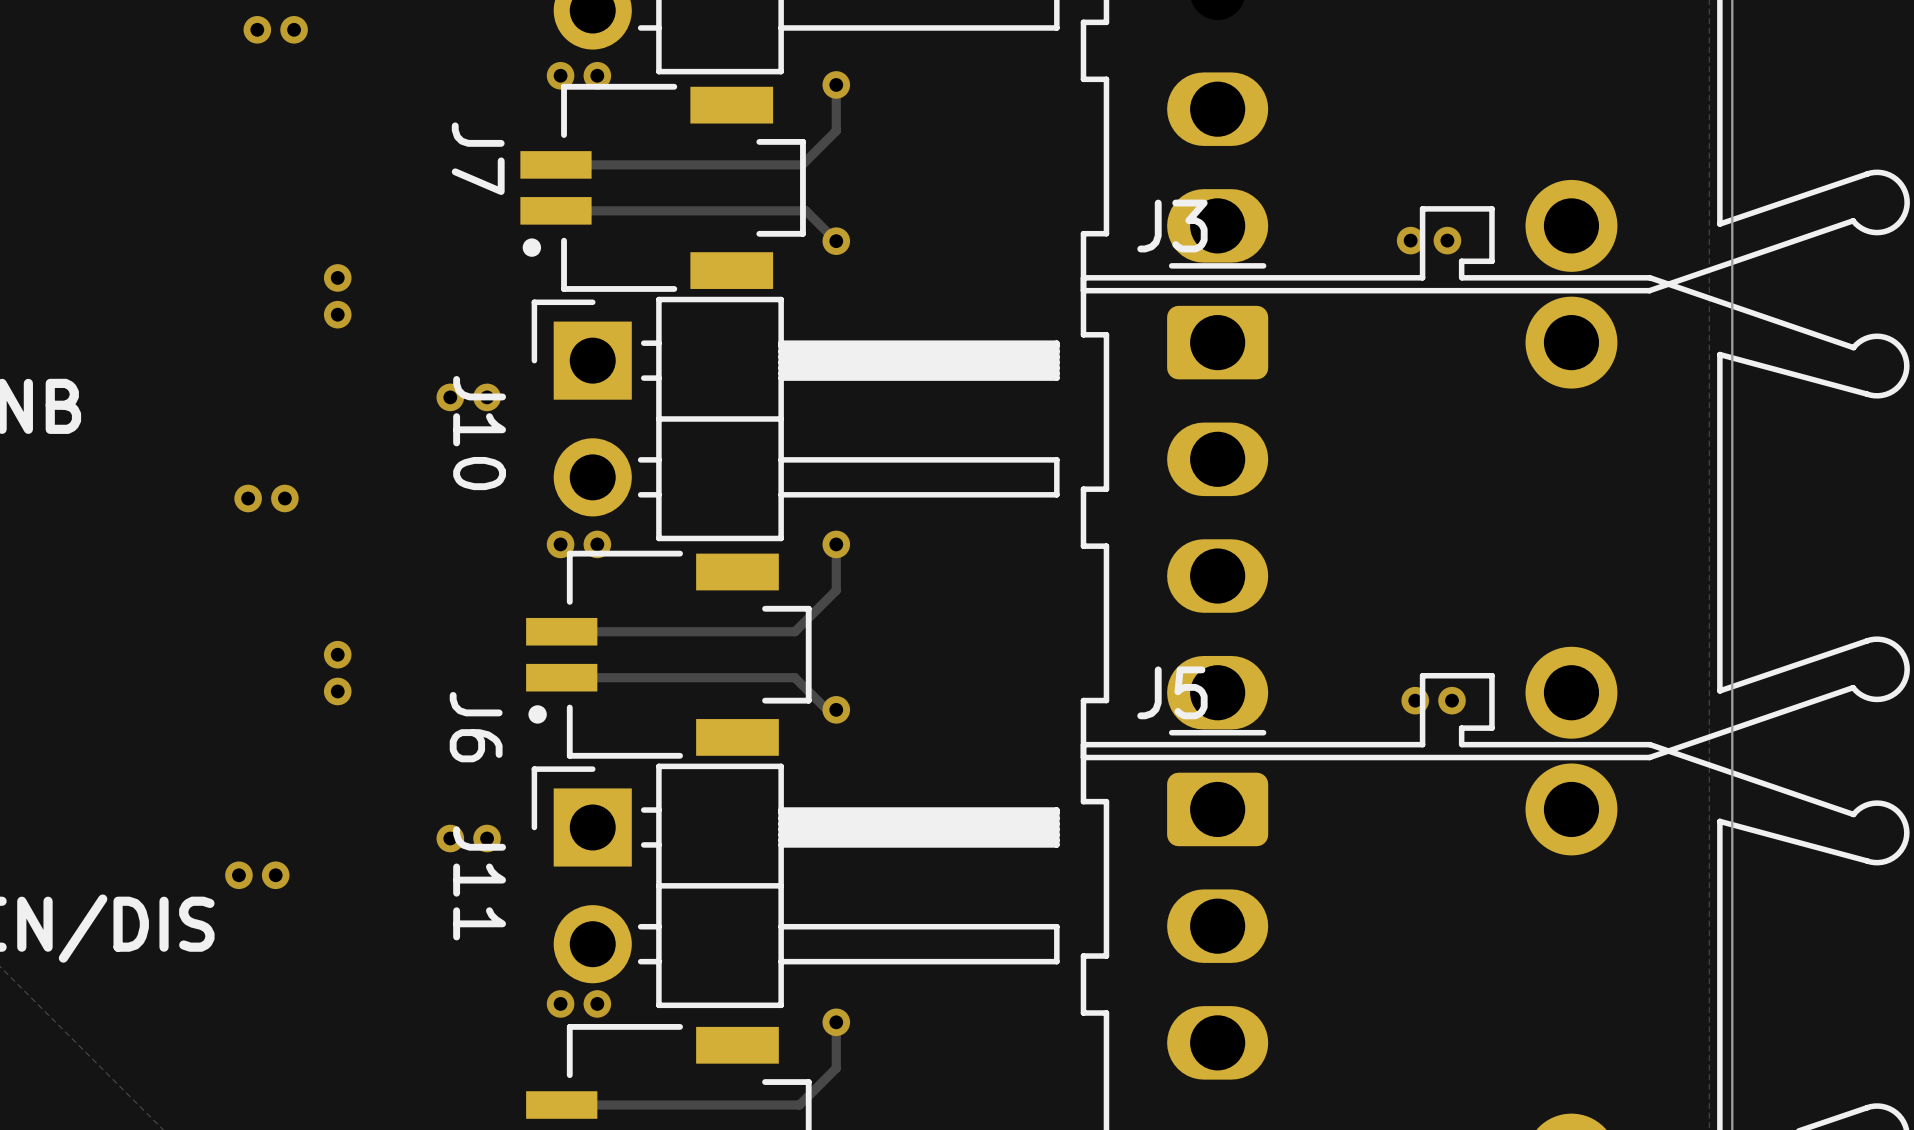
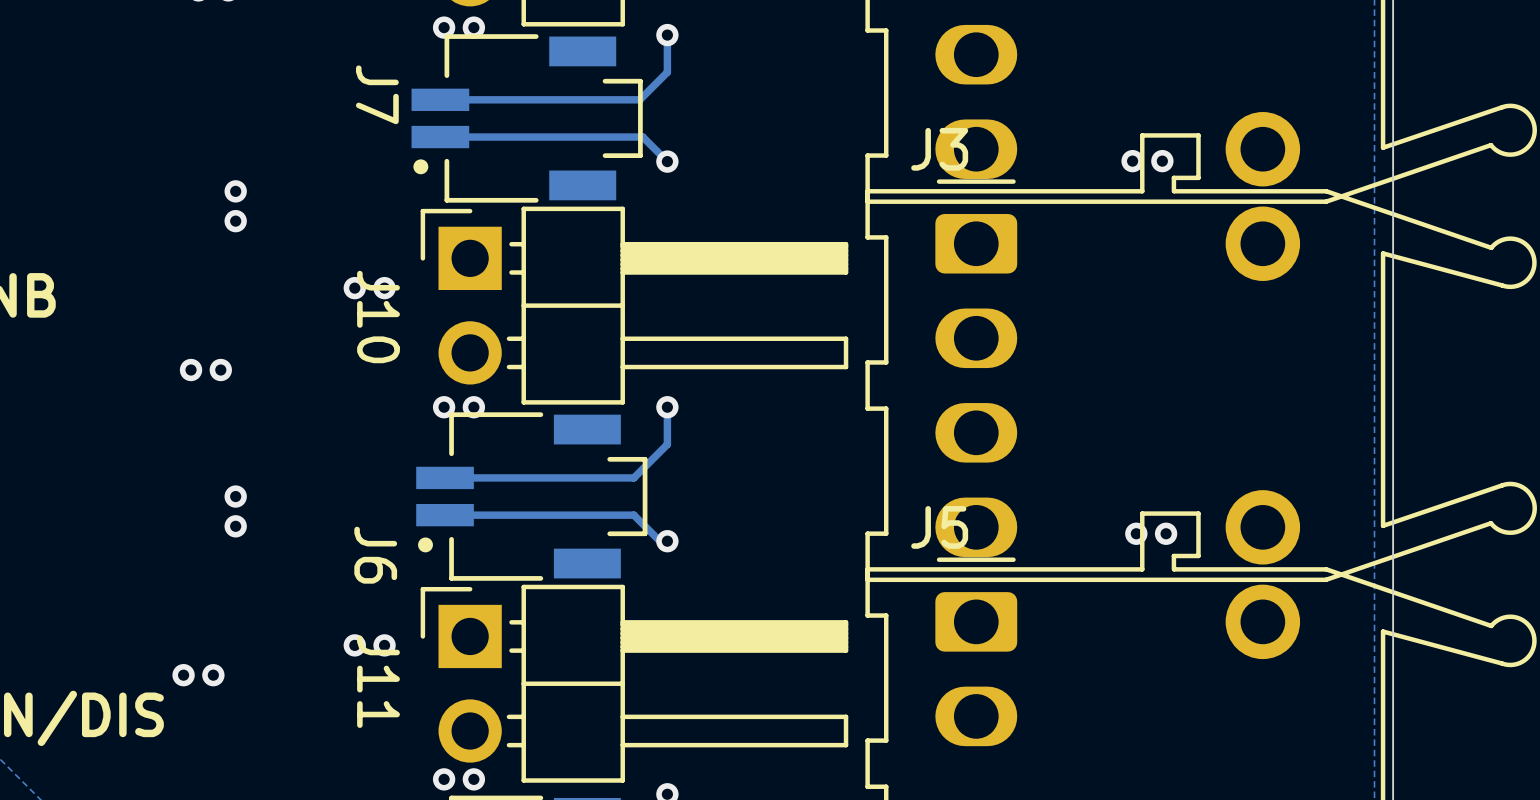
via: none -> (235, 191)
via: (337, 277) -> none
via: none -> (235, 221)
via: (337, 314) -> none
via: none -> (235, 496)
via: (337, 654) -> none
via: none -> (235, 526)
via: (337, 691) -> none

